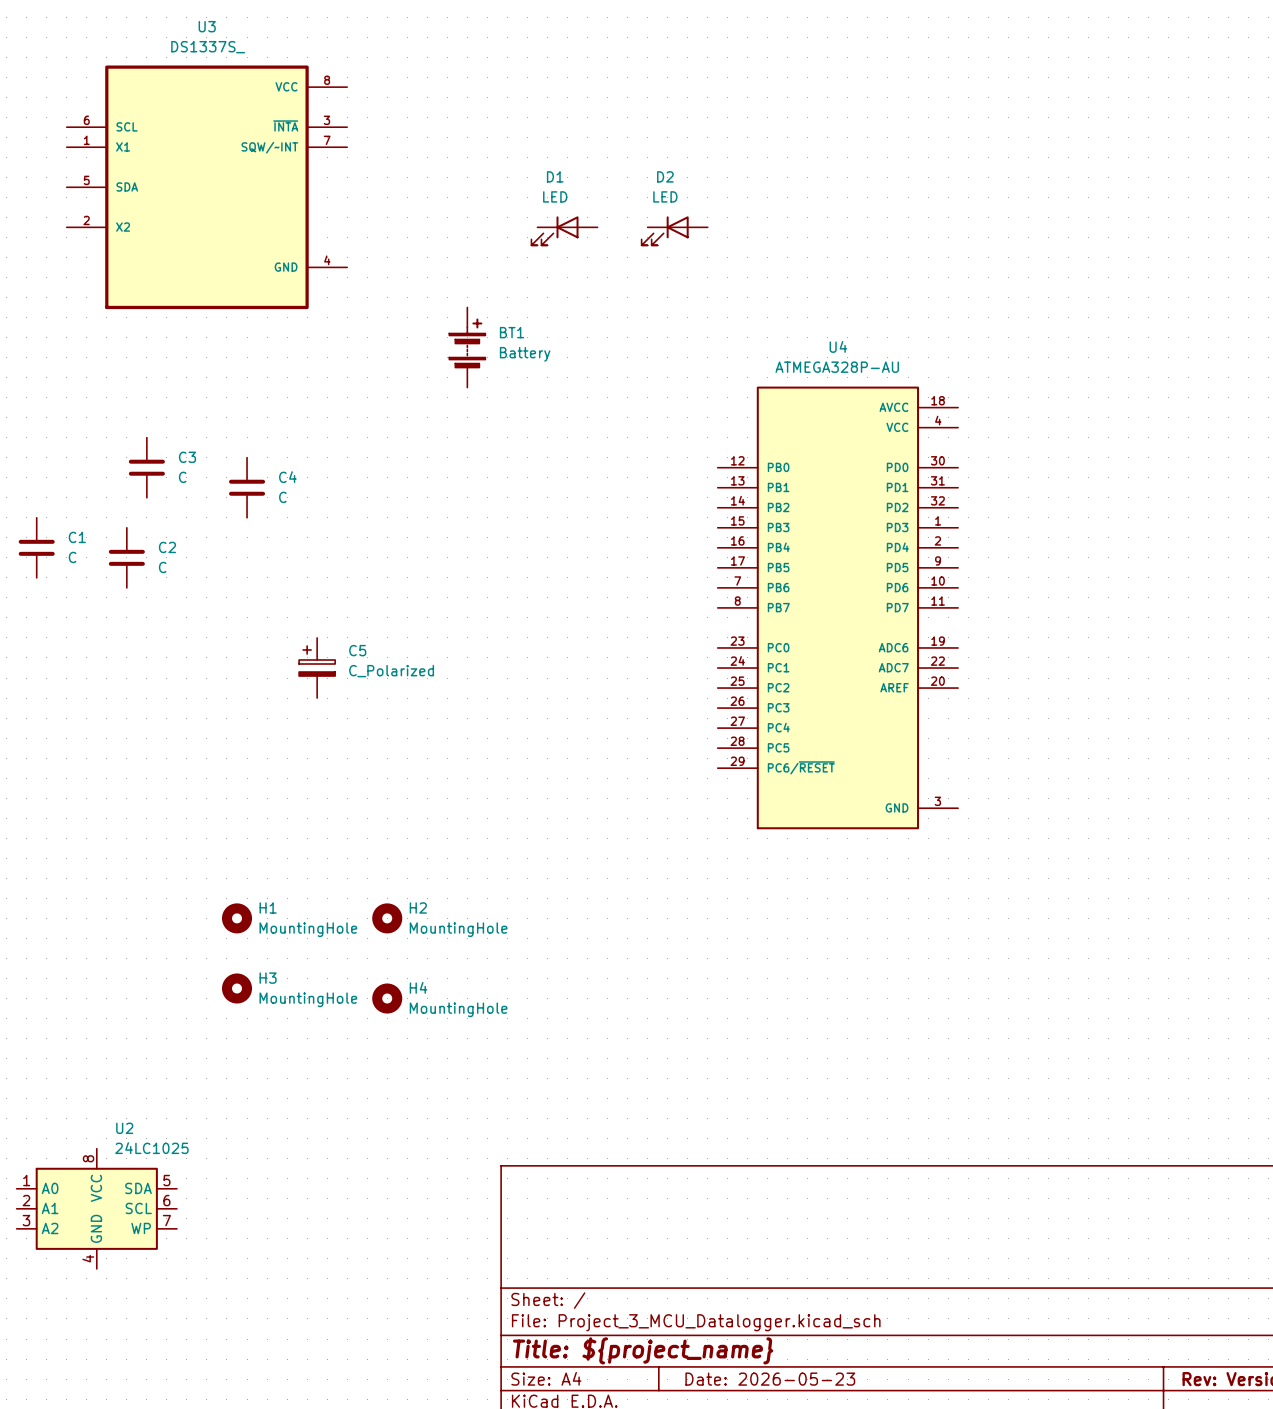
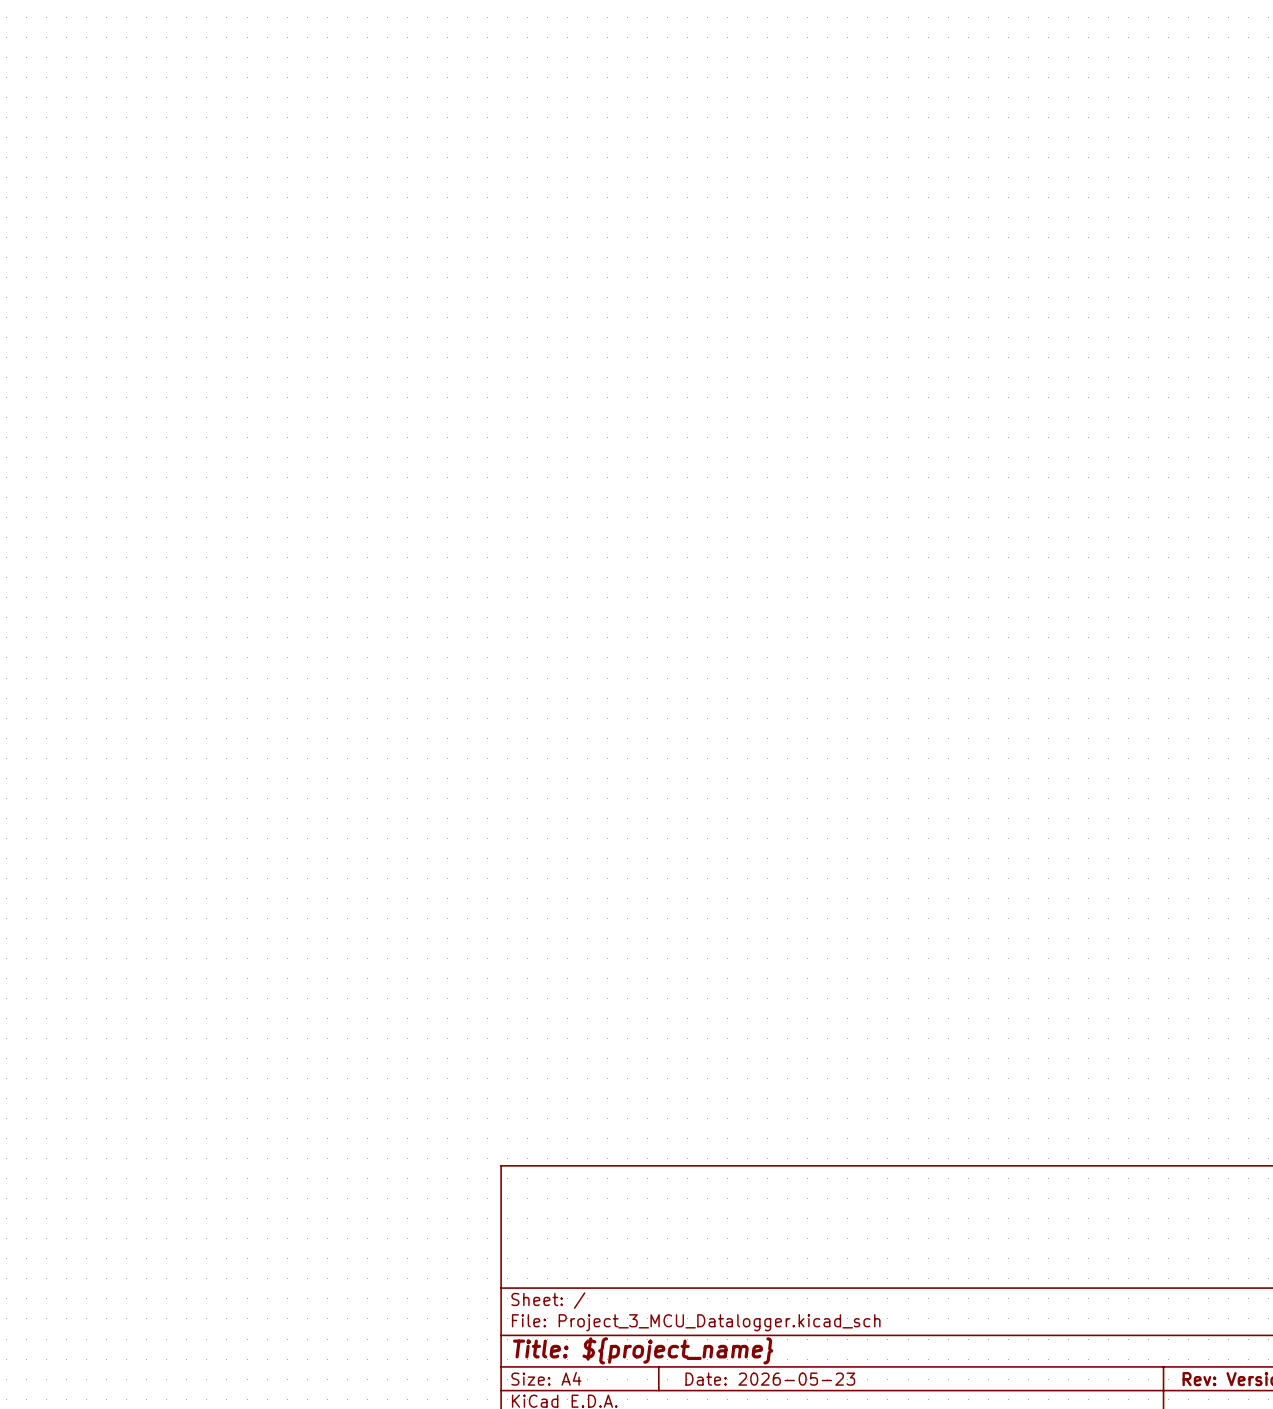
U3: DS1337S_ (206, 187) -> none
D1: LED (564, 230) -> none
D2: LED (674, 230) -> none
BT1: Battery (467, 347) -> none
C3: C (146, 467) -> none
C4: C (247, 487) -> none
C1: C (36, 547) -> none
C2: C (126, 557) -> none
U4: ATMEGA328P-AU (837, 607) -> none
C5: C_Polarized (317, 668) -> none
H1: MountingHole (237, 918) -> none
H2: MountingHole (387, 918) -> none
H3: MountingHole (237, 988) -> none
H4: MountingHole (387, 998) -> none
U2: 24LC1025 (96, 1208) -> none

